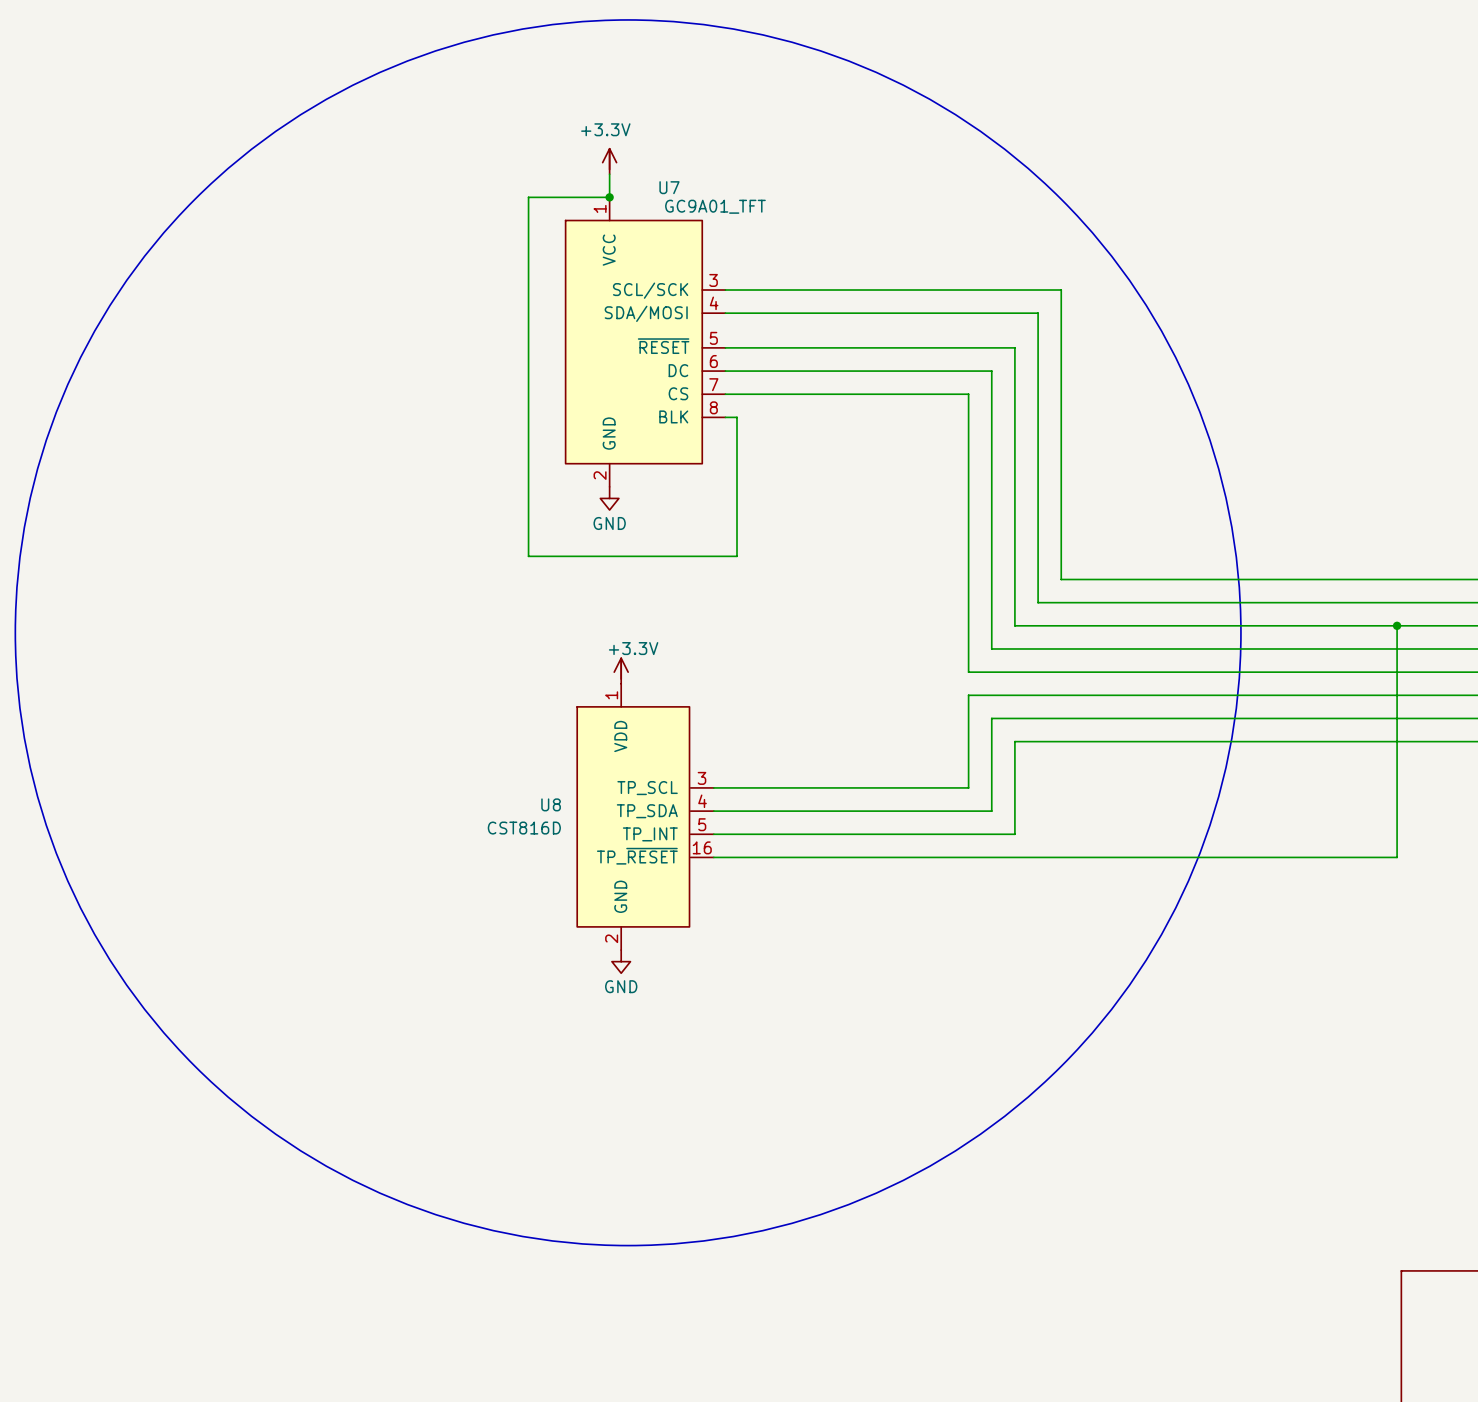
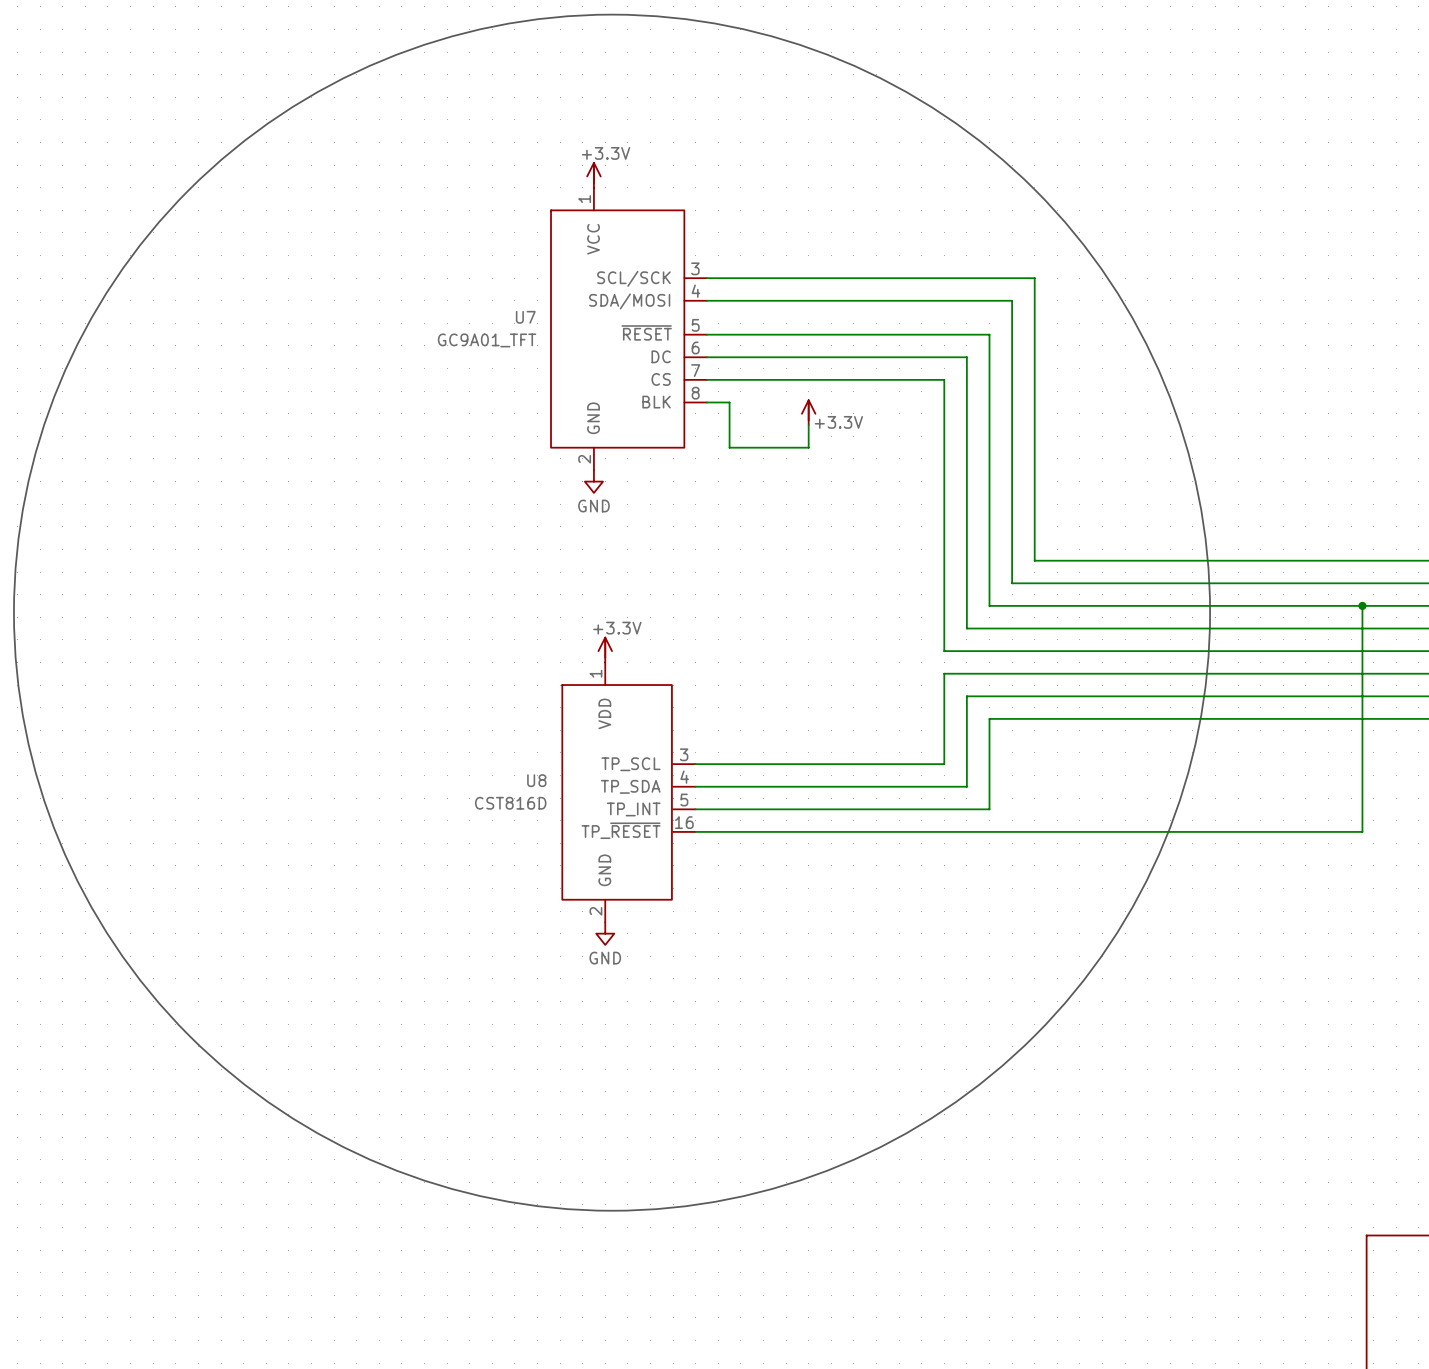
power symbol text position: +3.3V (605, 129) -> +3.3V (606, 153)
power symbol position: +3.3V (609, 161) -> +3.3V (593, 175)
wire: (609, 174) (609, 197) (528, 197) (528, 556) (737, 556) (737, 417) -> (808, 425) (808, 447) (729, 447) (729, 402) (718, 402)
U7 name position: U7 (669, 187) -> U7 (525, 317)
junction: (609, 197) -> none
U7 value position: GC9A01_TFT (715, 206) -> GC9A01_TFT (487, 340)
power symbol: none -> +3.3V (808, 412)

